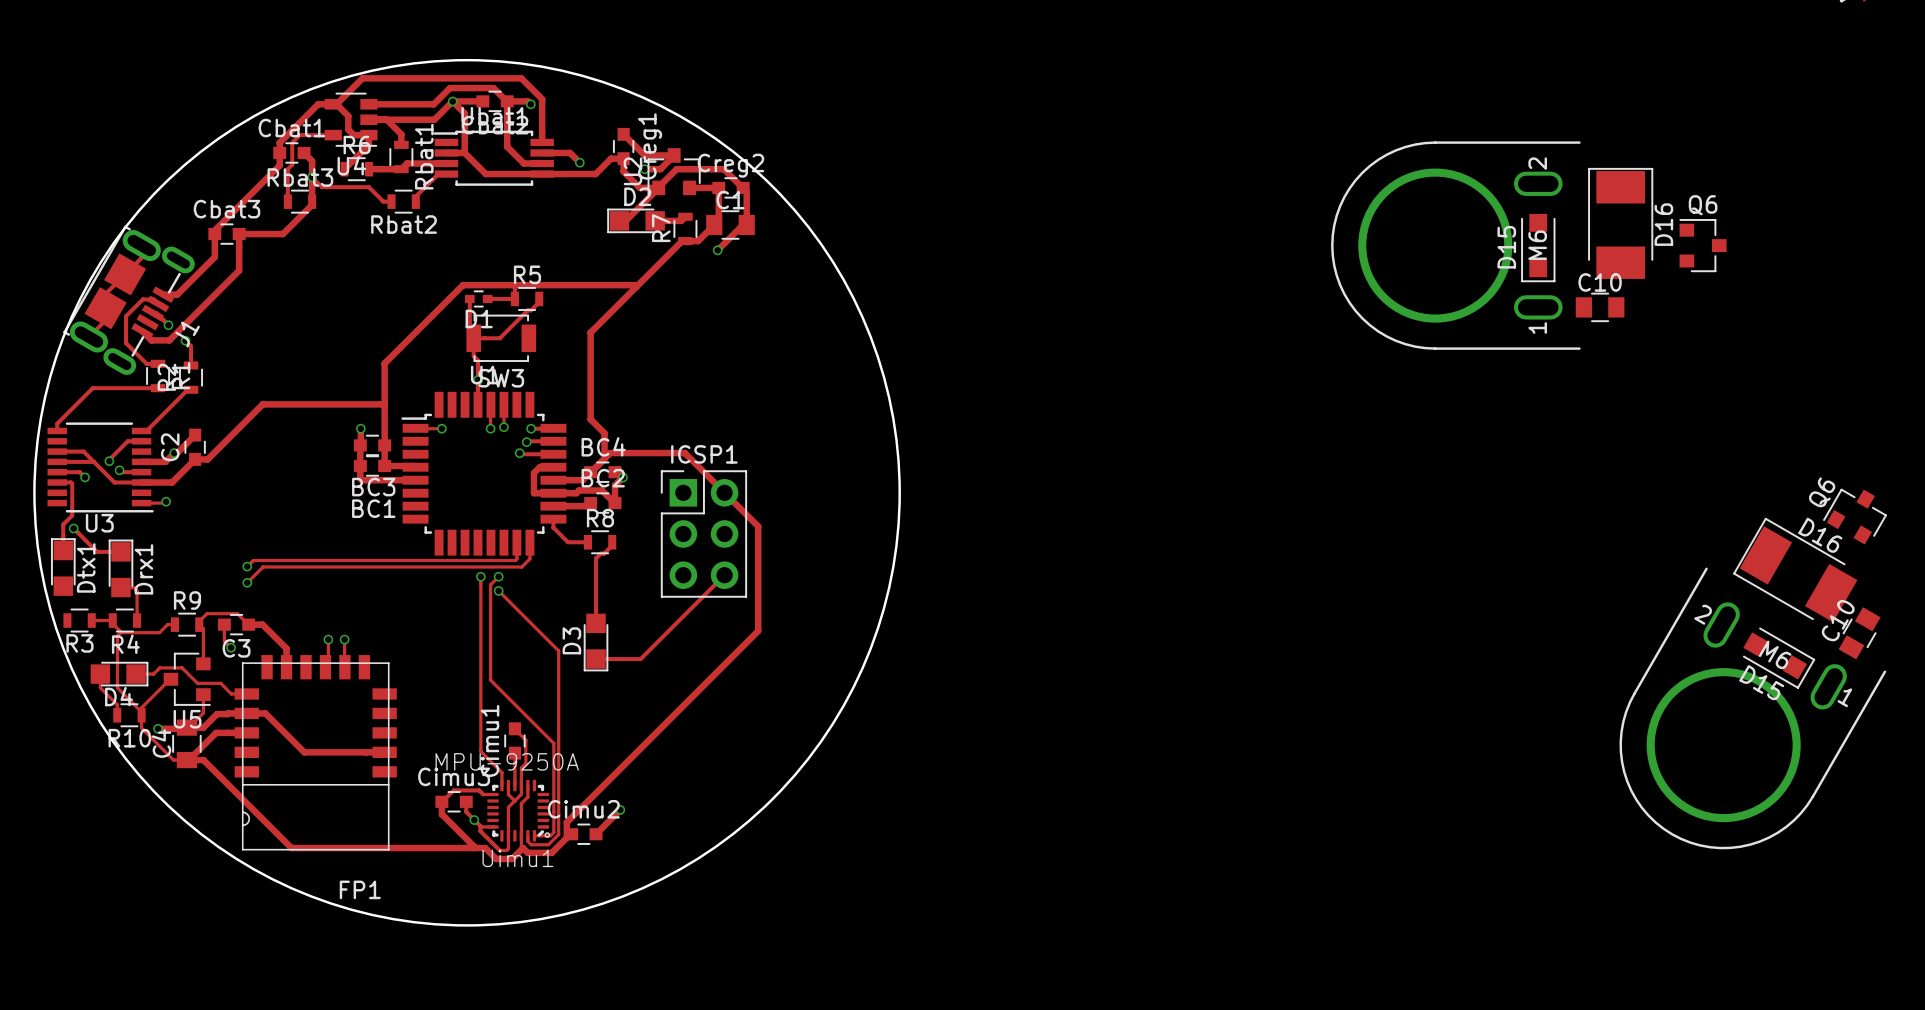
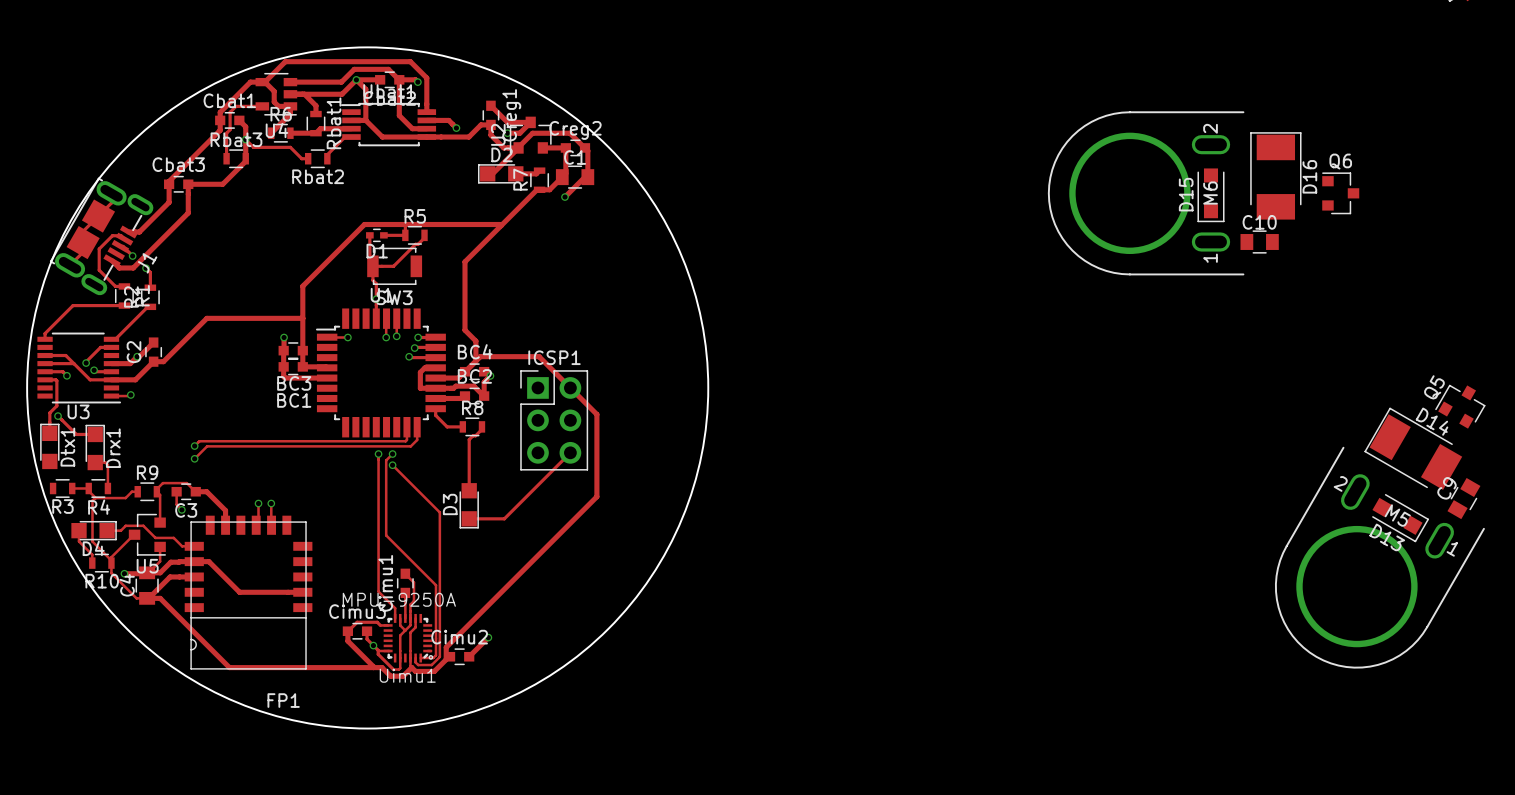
Q6 name: Q6 (1822, 492) -> Q5 (1434, 387)
D16 name: D16 (1820, 535) -> D14 (1432, 421)
C10 name: C10 (1838, 620) -> C9 (1446, 488)
M6 name: M6 (1775, 654) -> M5 (1397, 515)
D15 name: D15 (1761, 682) -> D13 (1387, 537)

